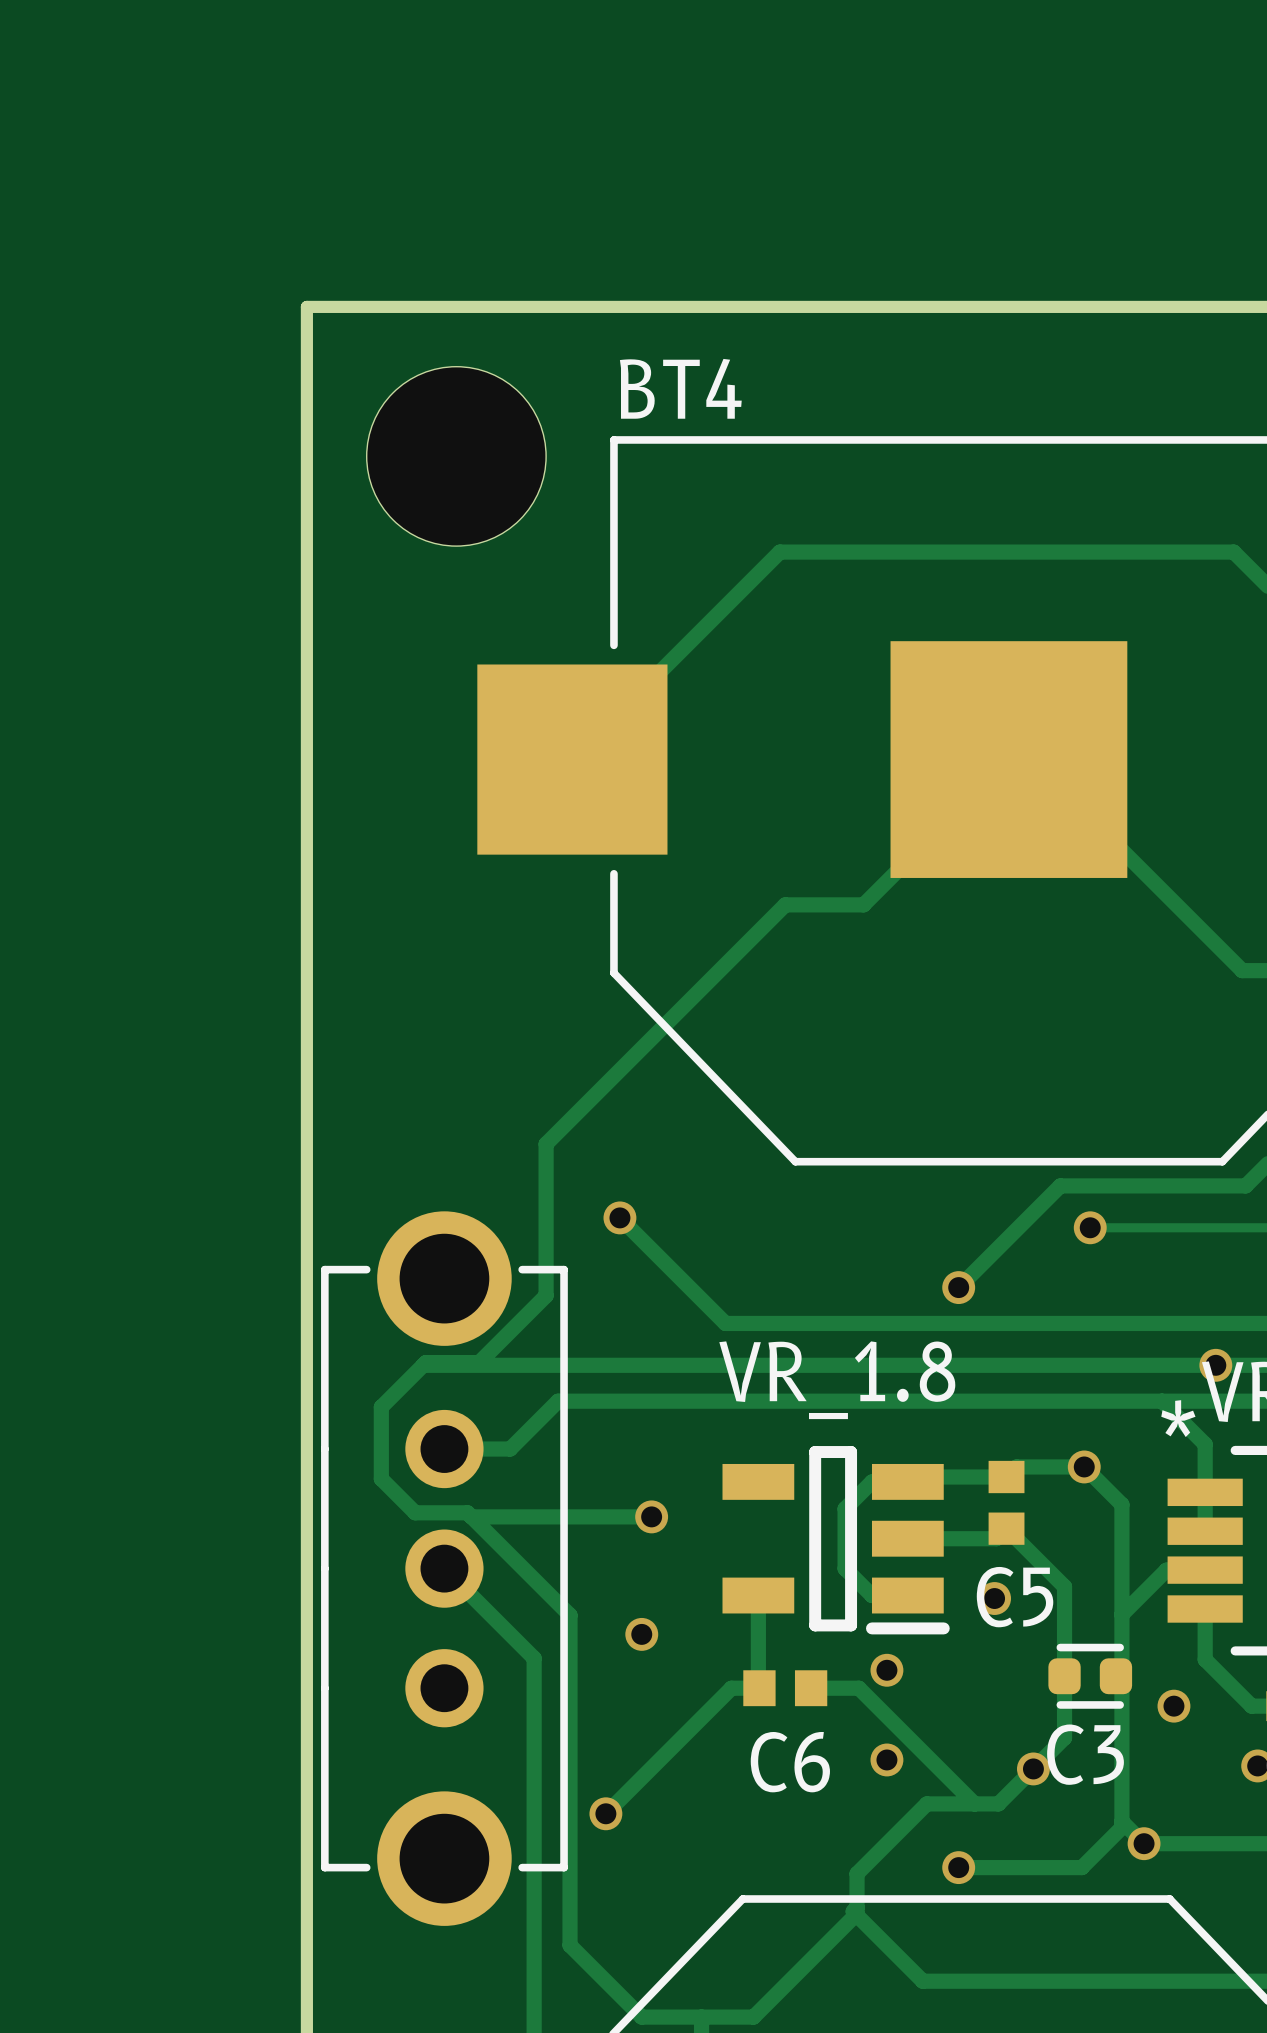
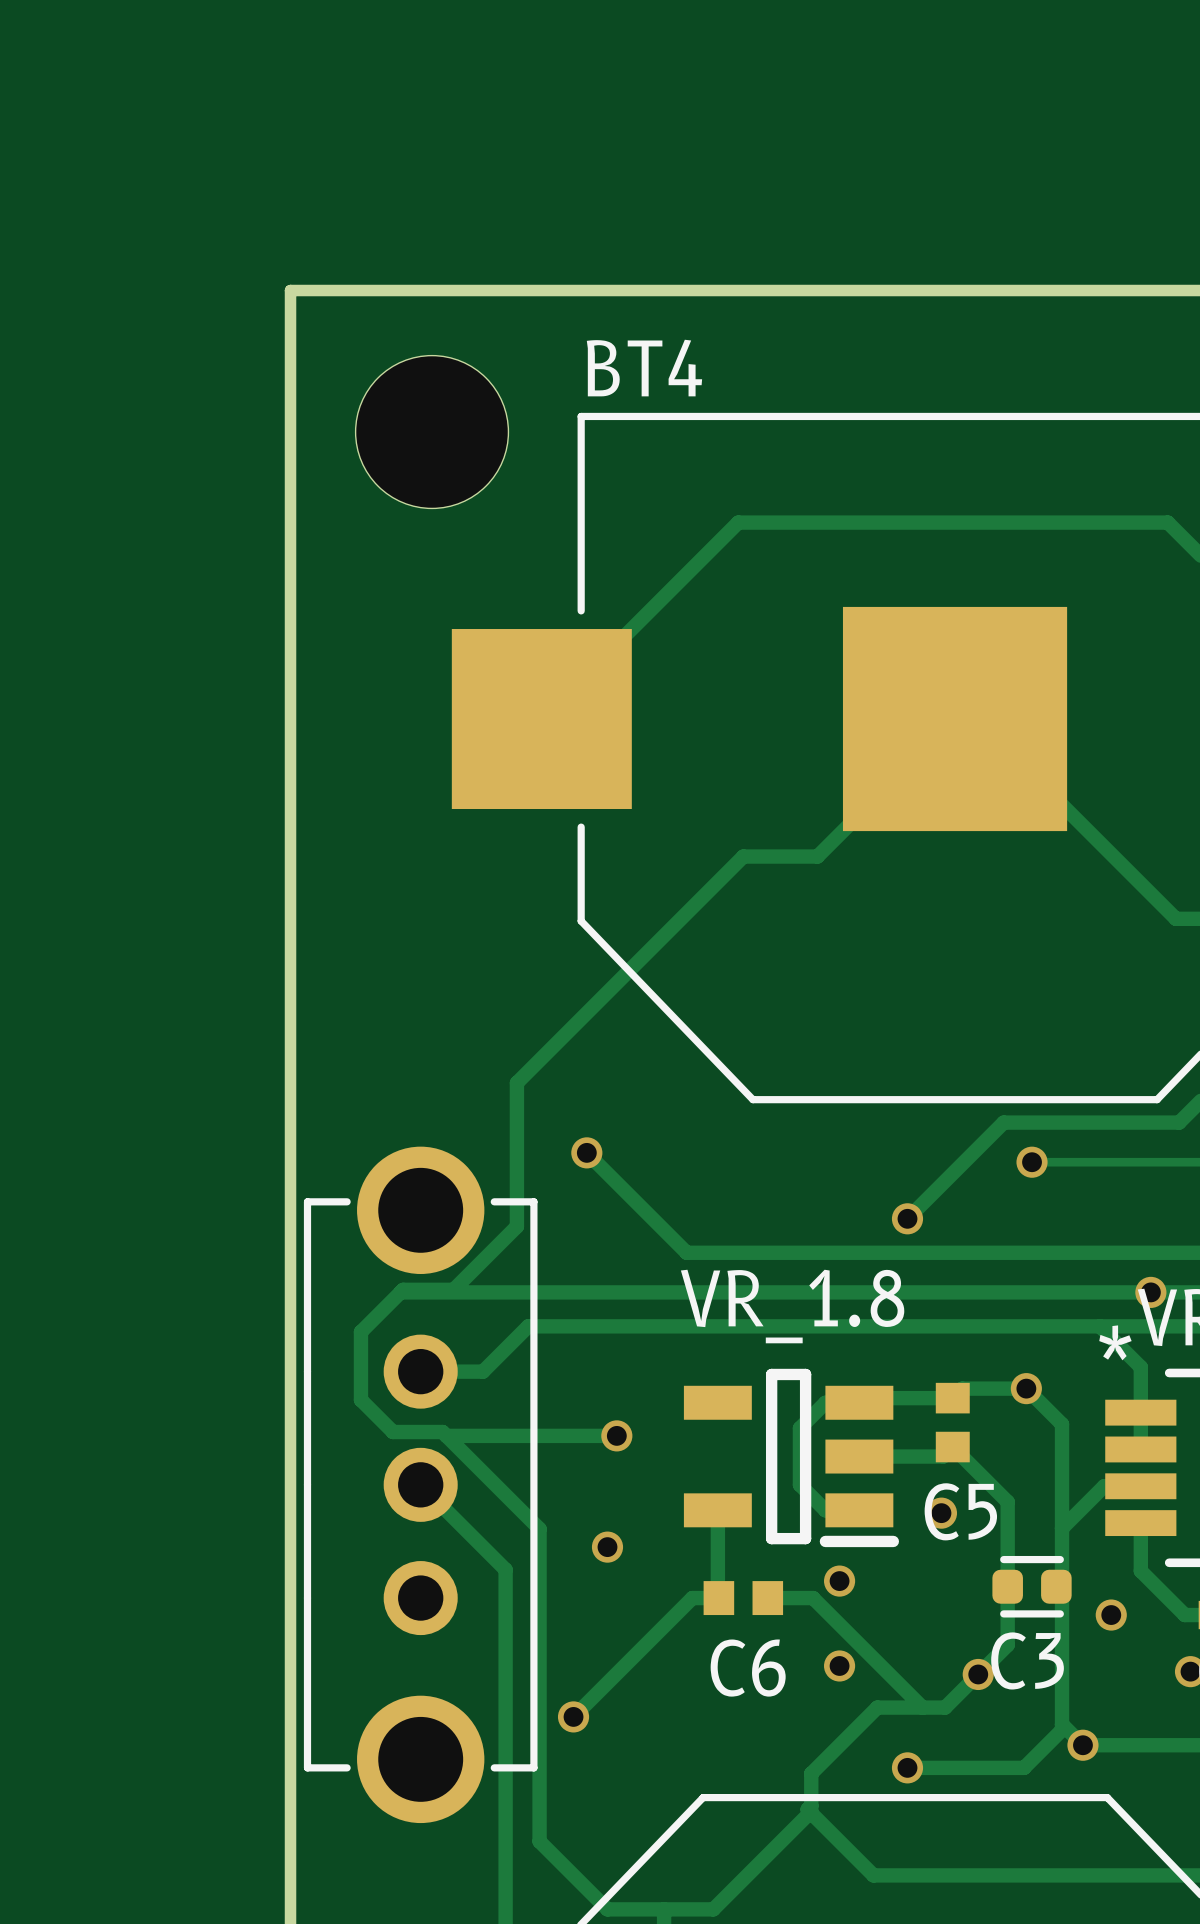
hole size: [366, 366, 547, 547] -> [355, 355, 509, 509]

